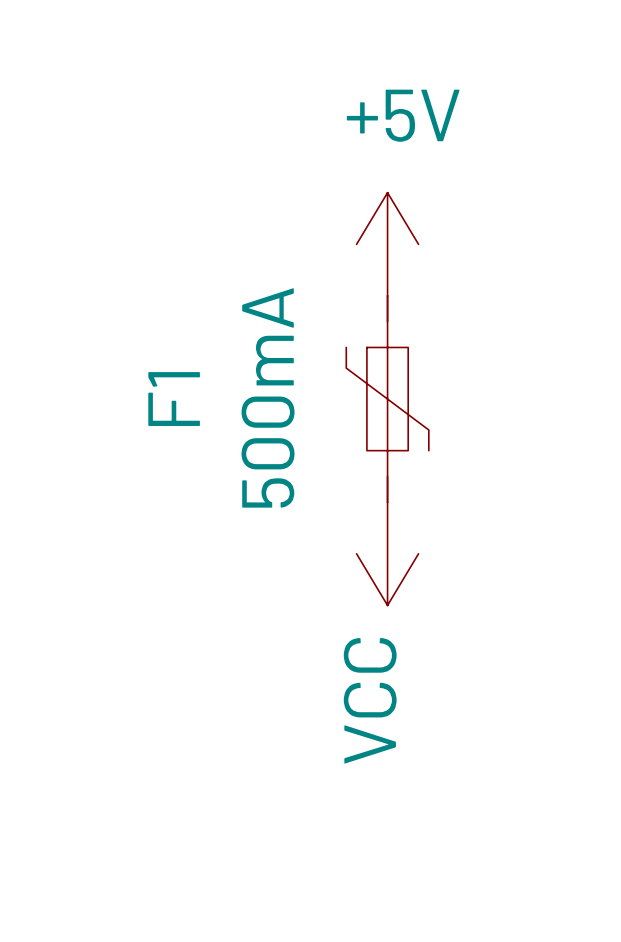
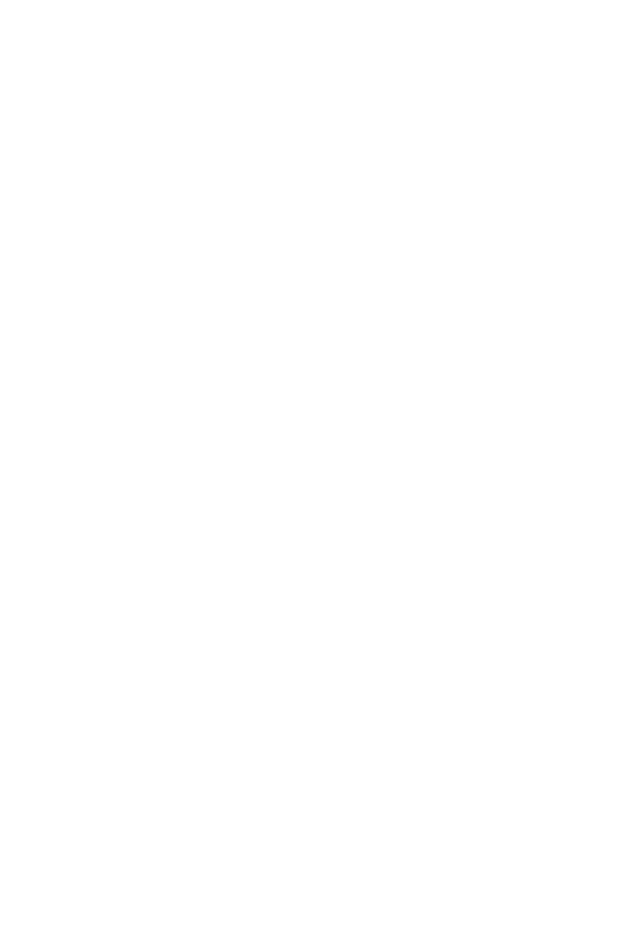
power symbol: +5V (387, 244) -> none
F1: 500mA (387, 399) -> none
power symbol: VCC (387, 553) -> none

